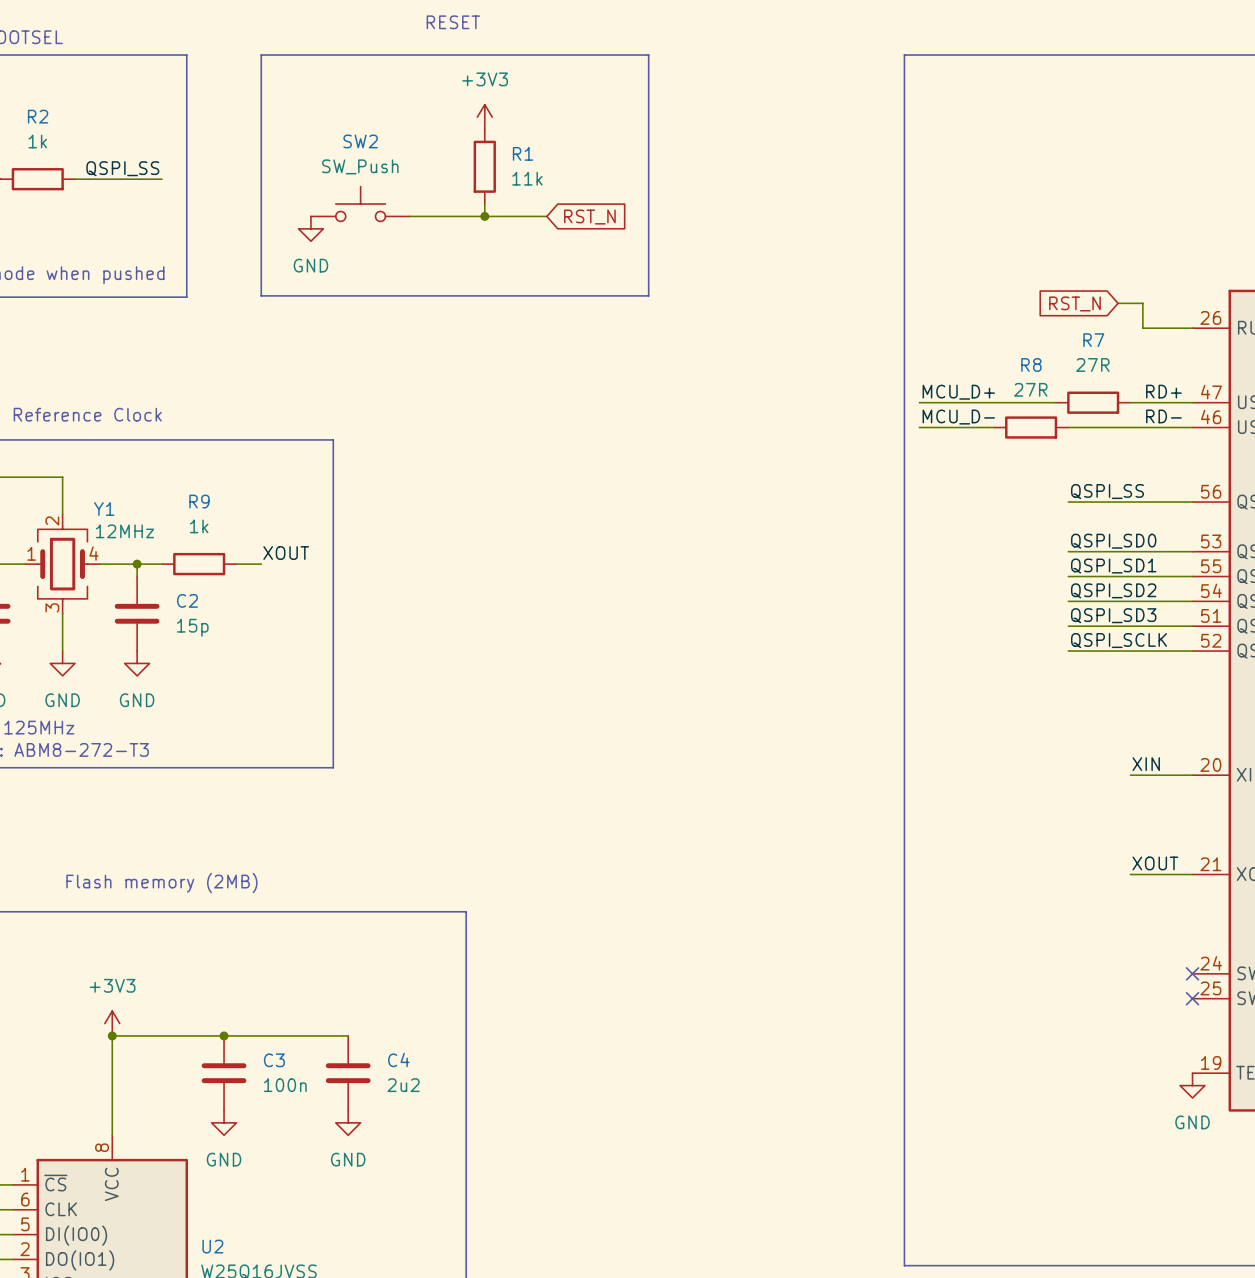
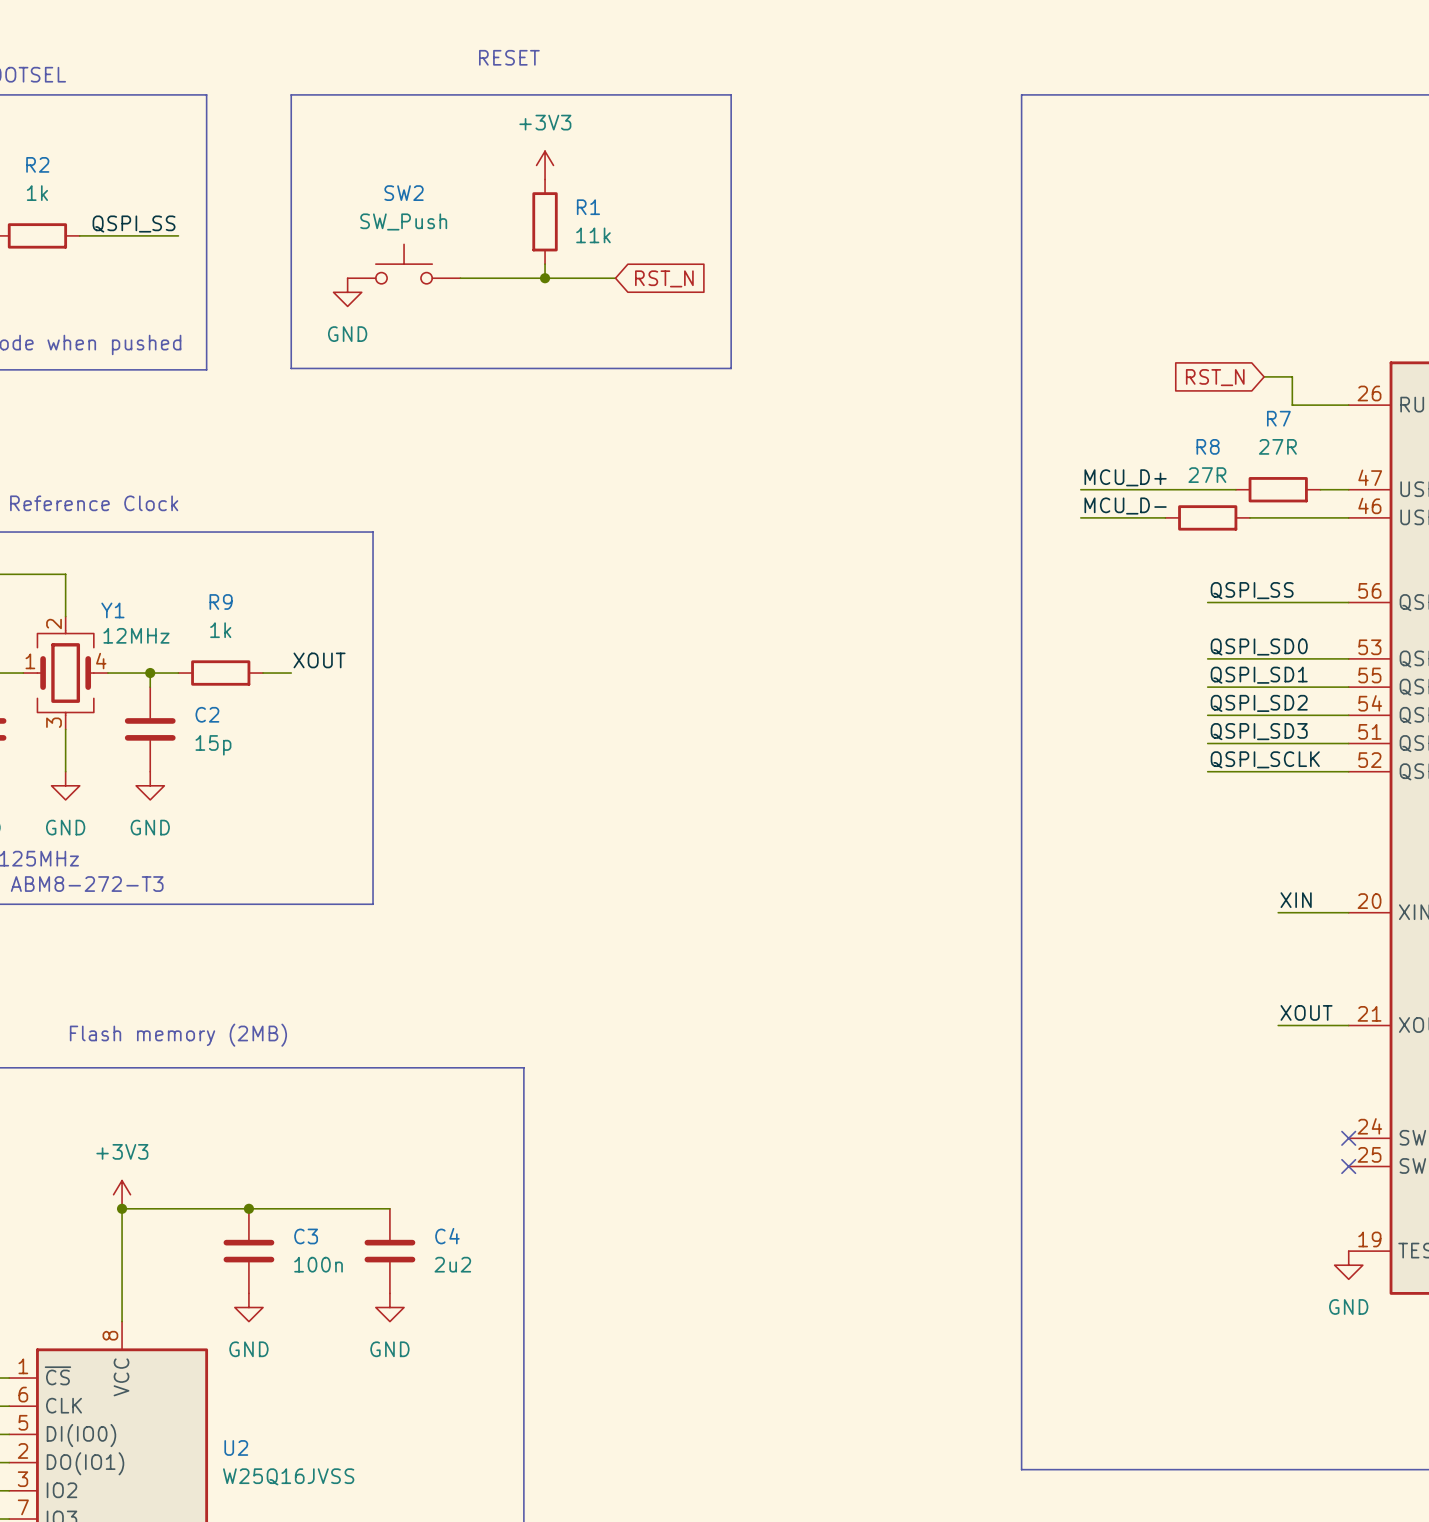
label: RD+ (1163, 391) -> none
label position: MCU_D+ (958, 392) -> MCU_D+ (1125, 477)
wire: (919, 402) (956, 402) -> none
R7 position: (1093, 402) -> (1278, 489)
wire: (1130, 402) (1167, 402) -> (1193, 489) (1235, 489)
label: RD- (1163, 416) -> none
label position: MCU_D- (958, 417) -> MCU_D- (1125, 506)
wire: (919, 427) (956, 427) -> none
R8 position: (1031, 427) -> (1207, 517)
wire: (1068, 427) (1105, 427) -> (1123, 517) (1165, 517)

